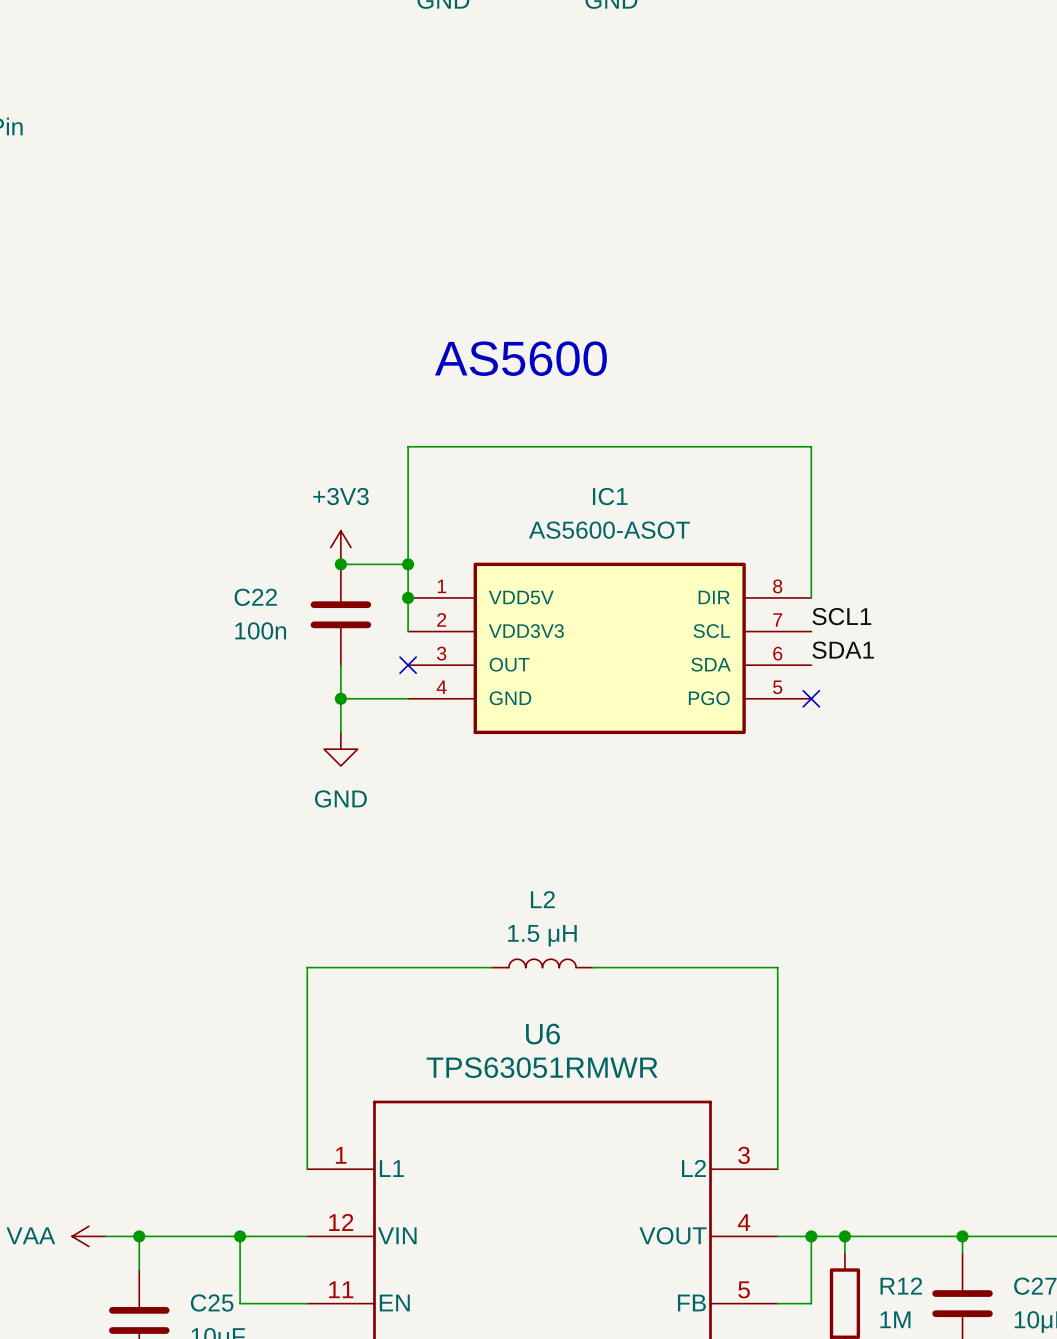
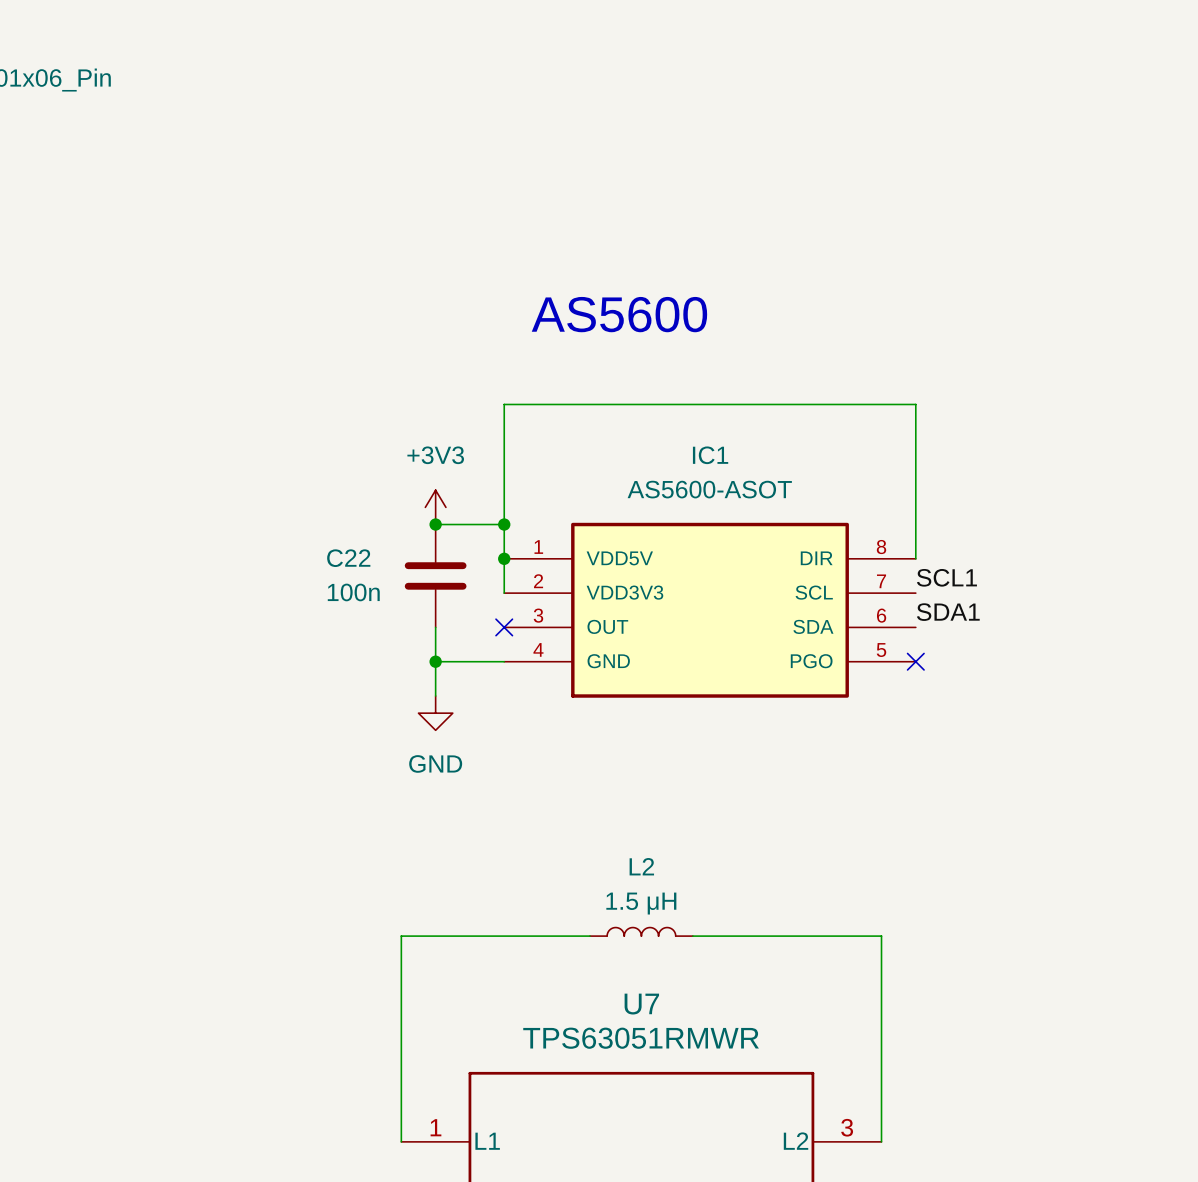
U6 name: U6 (542, 1034) -> U7 (641, 1004)

